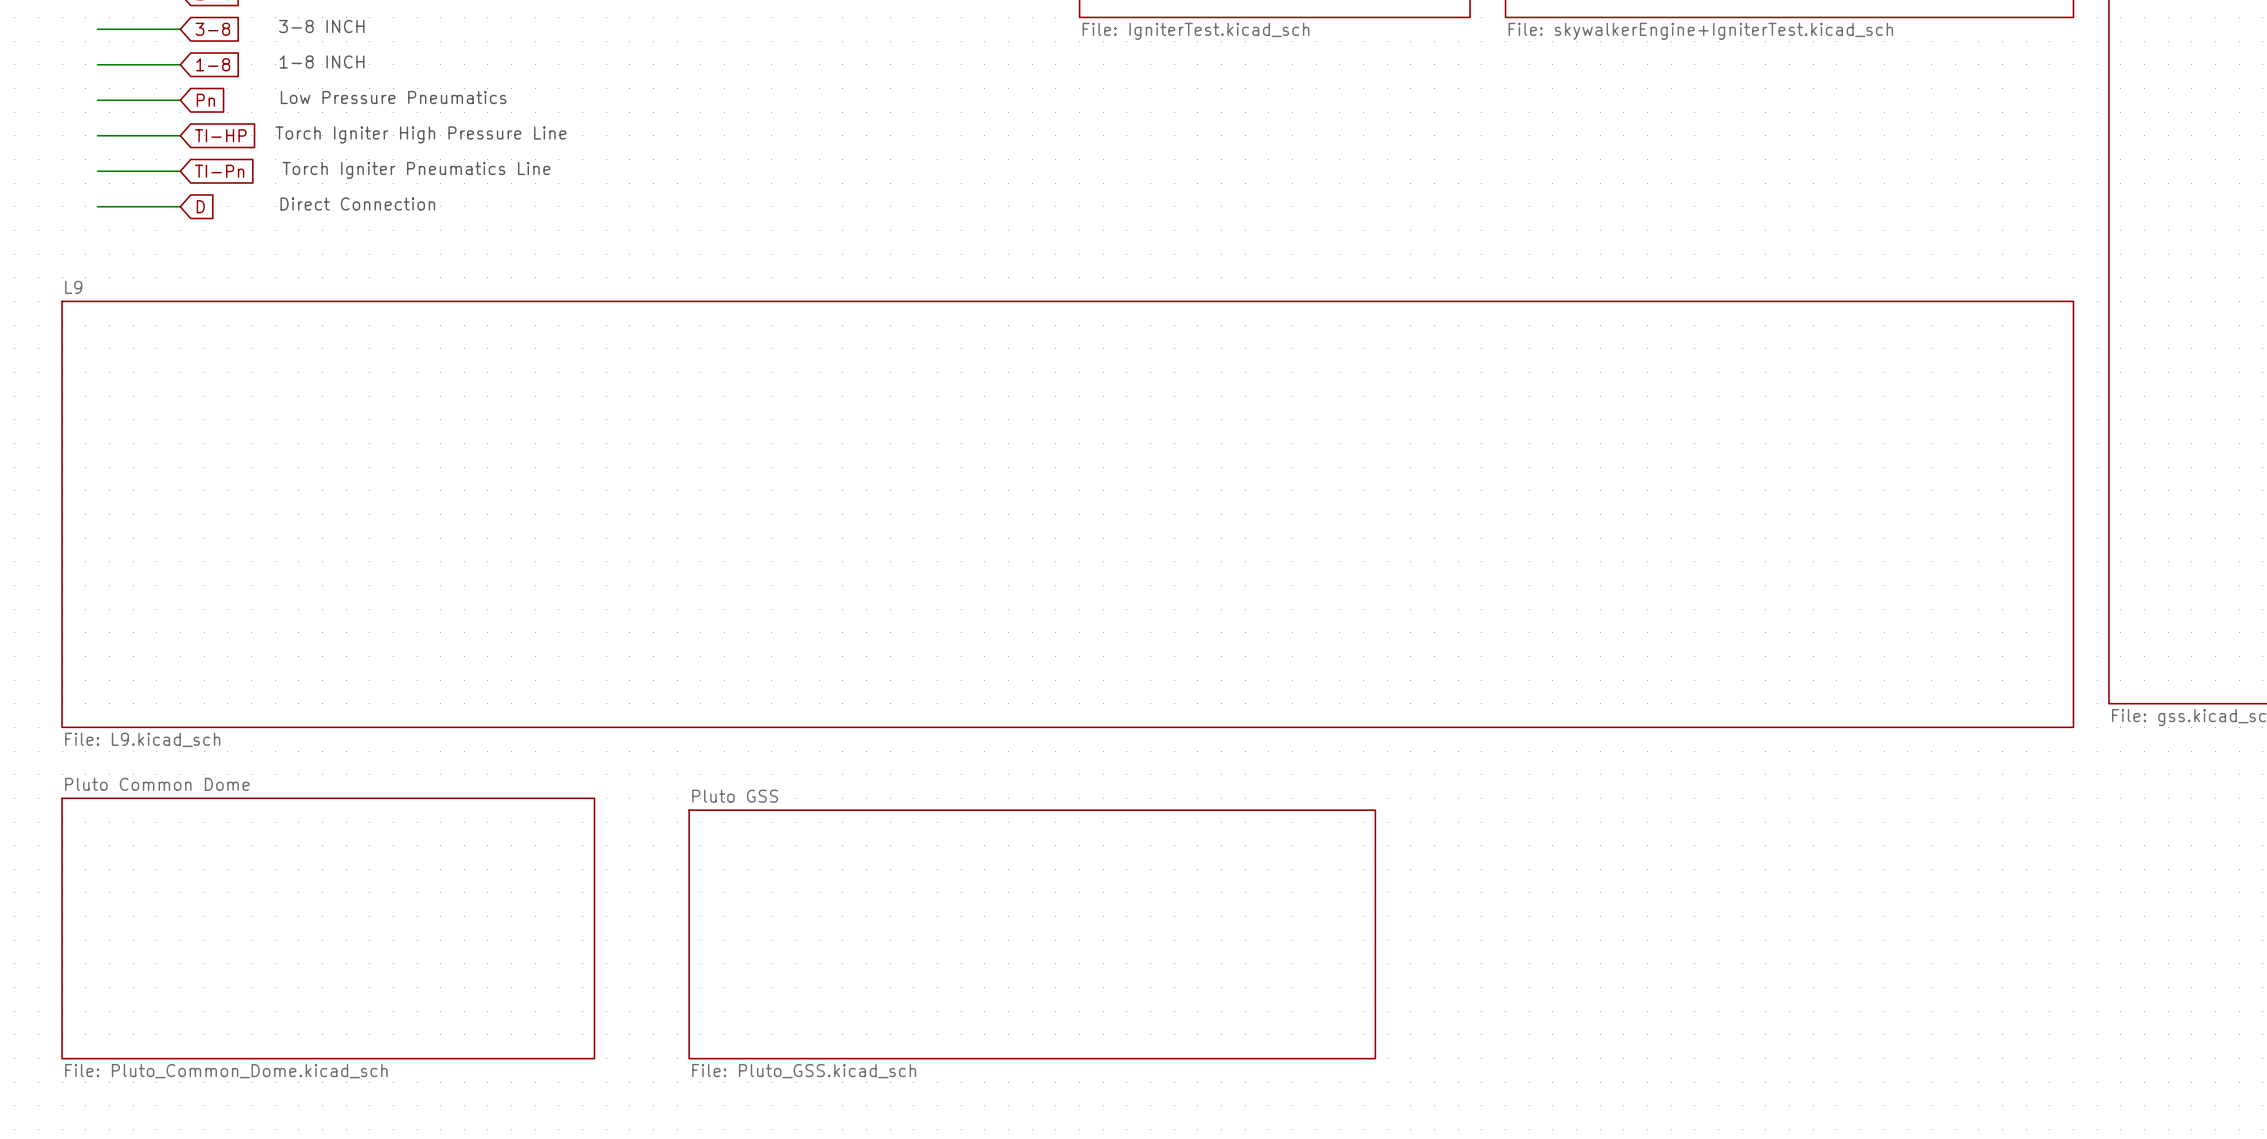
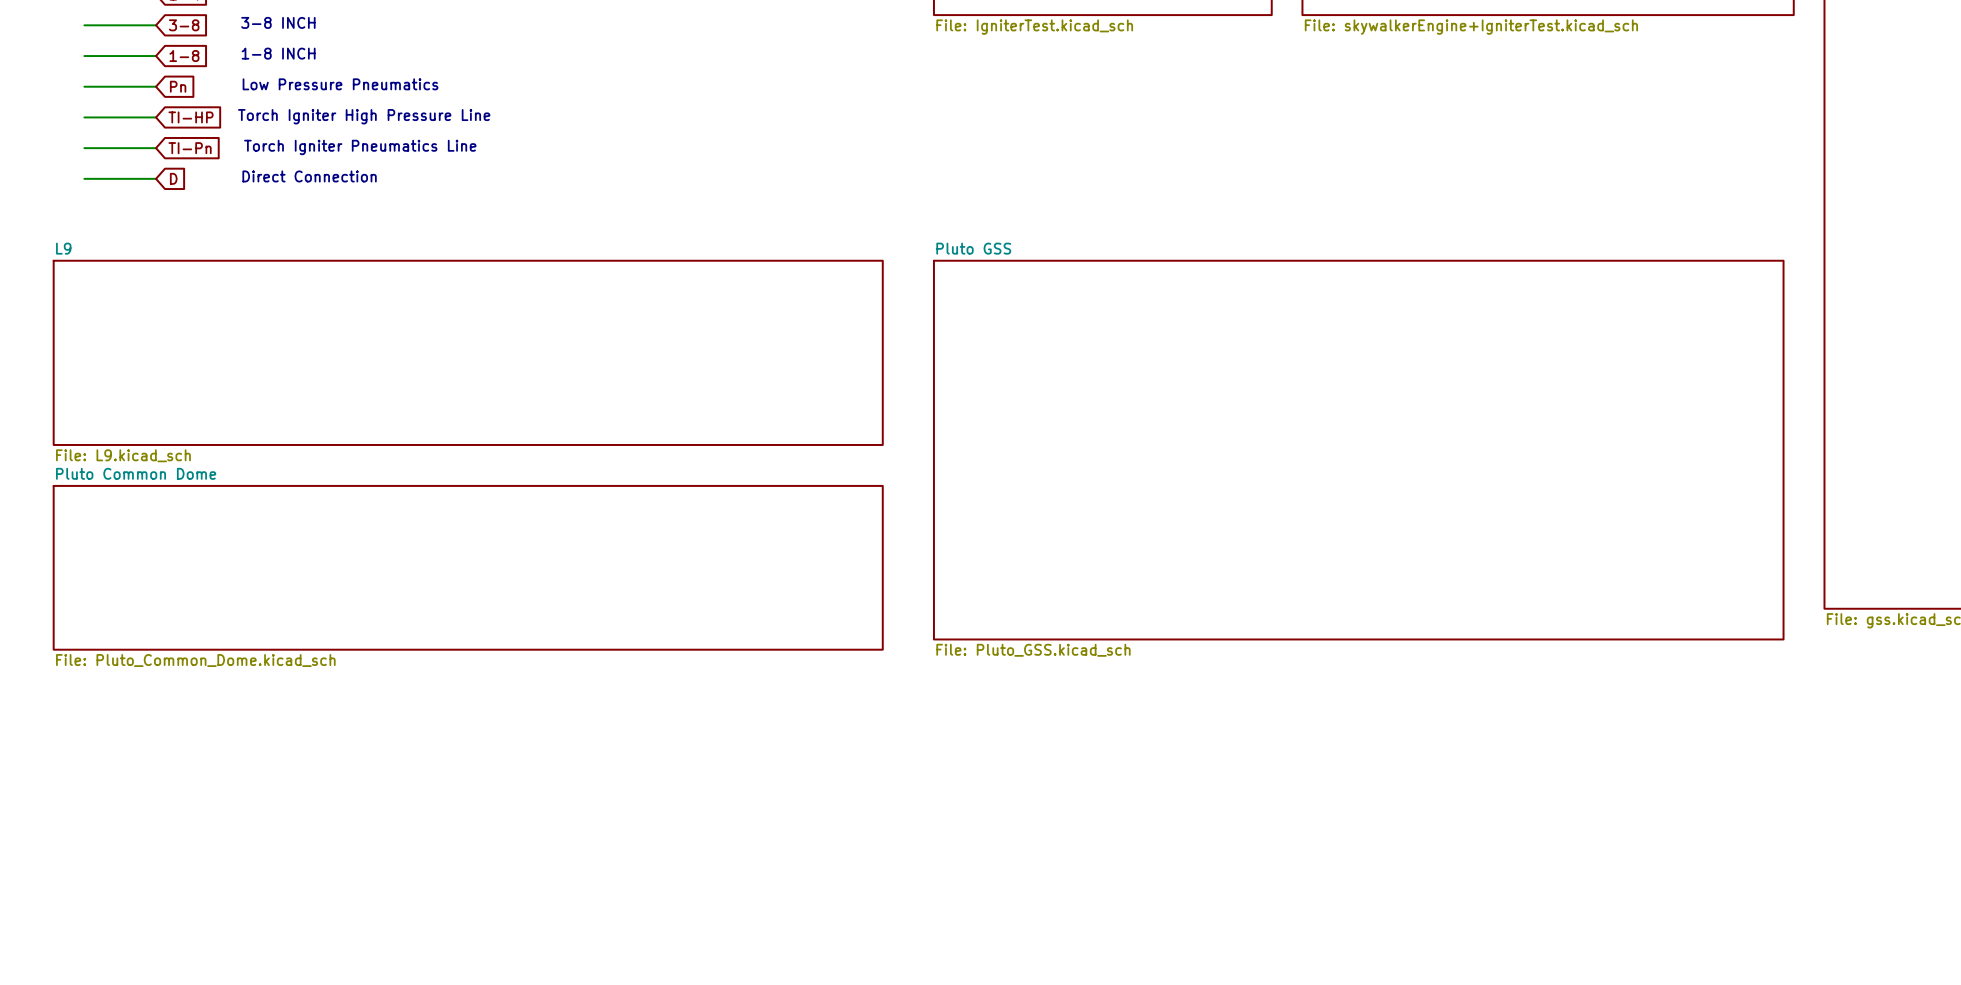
sheet L9 shape: [61, 300, 2075, 729] -> [53, 260, 884, 446]
sheet Pluto GSS: none -> File: Pluto_GSS.kicad_sch (1358, 450)
sheet Pluto Common Dome: none -> File: Pluto_Common_Dome.kicad_sch (468, 567)
sheet L9 value position: File: L9.kicad_sch (142, 739) -> File: L9.kicad_sch (123, 455)
sheet Pluto Common Dome: File: Pluto_Common_Dome.kicad_sch (328, 928) -> none
sheet Pluto GSS: File: Pluto_GSS.kicad_sch (1032, 934) -> none

